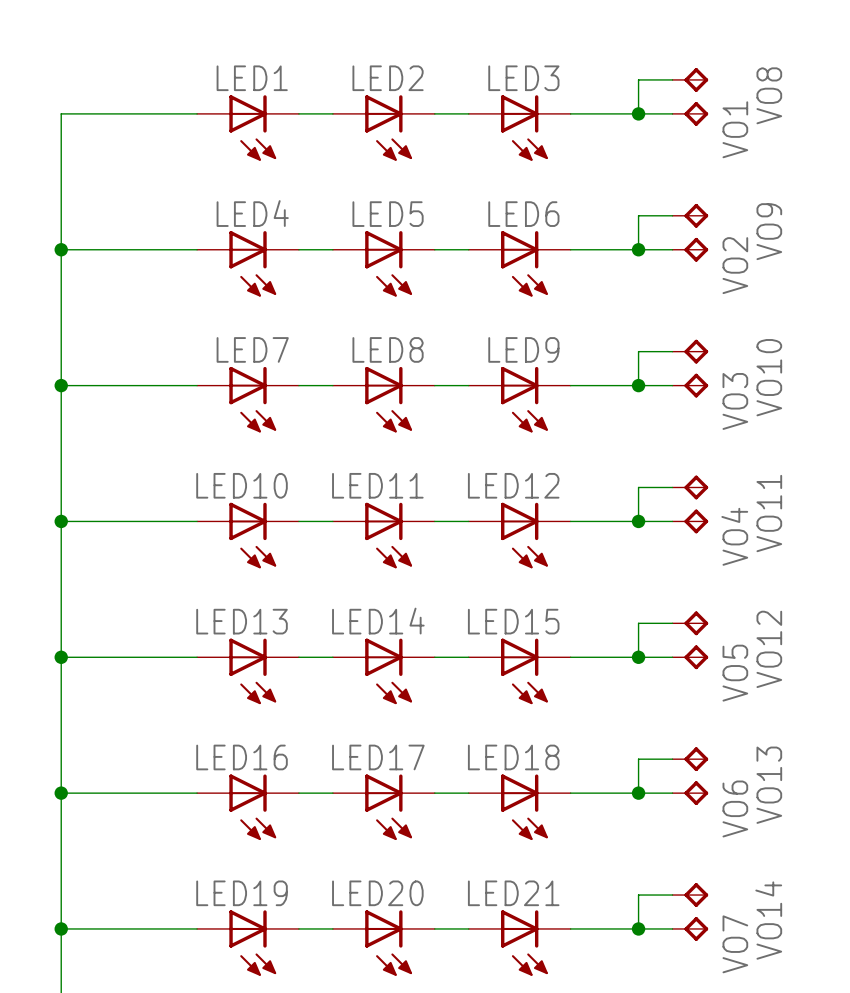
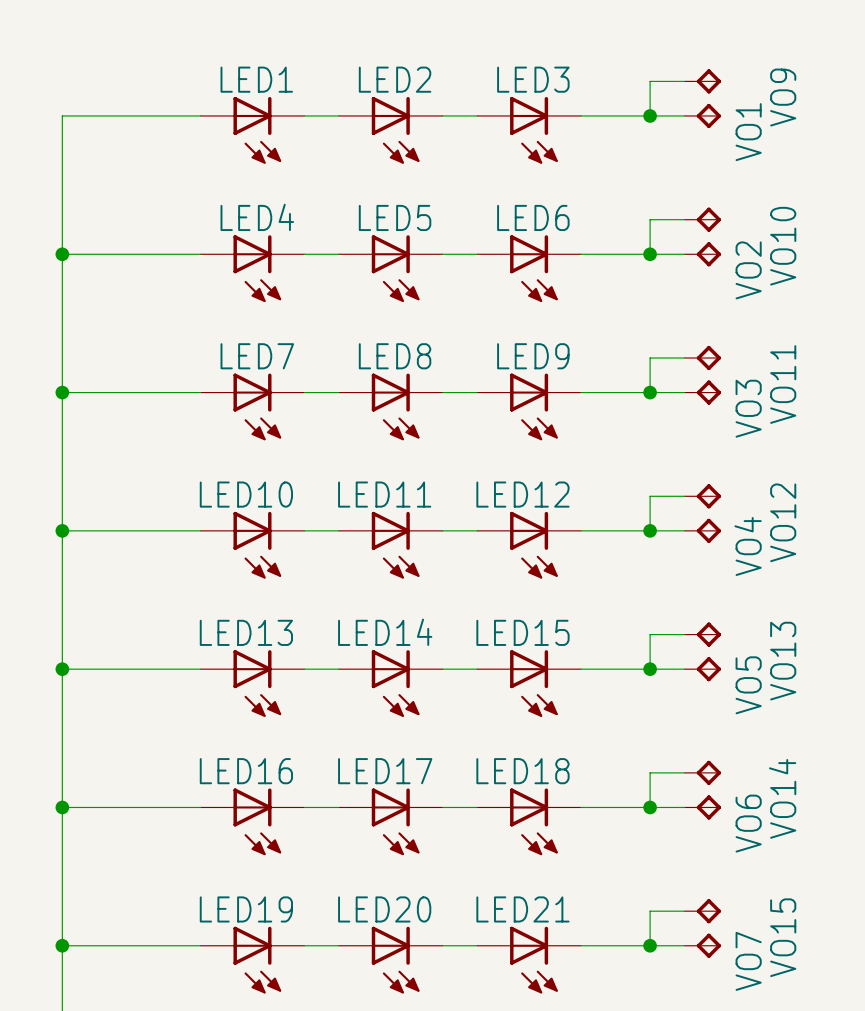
VO8 name: VO8 (769, 95) -> VO9 (783, 97)
VO9 name: VO9 (769, 231) -> VO10 (783, 246)
VO10 name: VO10 (769, 377) -> VO11 (783, 384)
VO11 name: VO11 (769, 513) -> VO12 (783, 522)
VO12 name: VO12 (769, 649) -> VO13 (783, 661)
VO13 name: VO13 (769, 785) -> VO14 (782, 798)
VO14 name: VO14 (768, 920) -> VO15 (783, 937)

